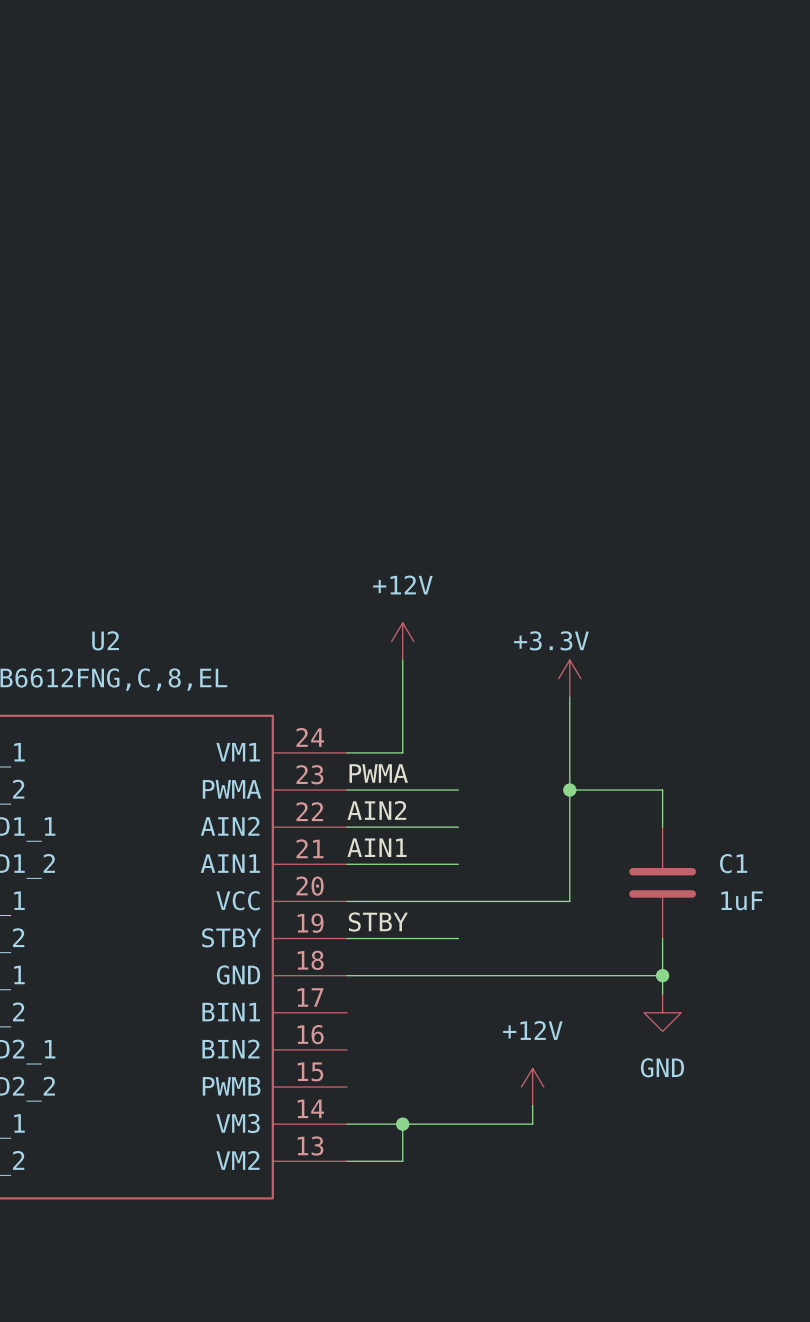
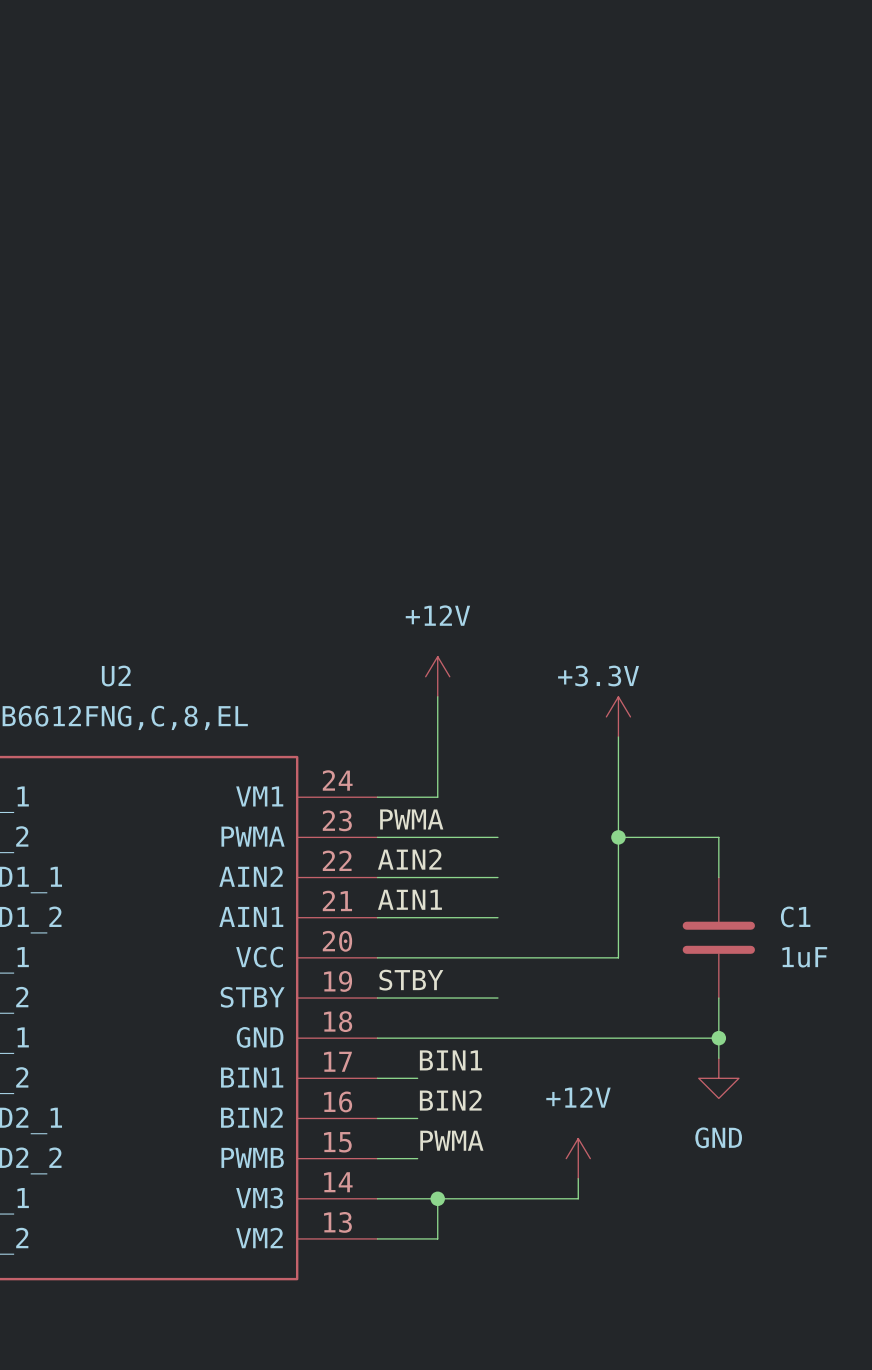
label: none -> BIN1 (450, 1060)
wire: none -> (377, 1078) (417, 1078)
label: none -> BIN2 (450, 1100)
wire: none -> (377, 1118) (417, 1118)
label: none -> PWMA (451, 1140)
wire: none -> (377, 1158) (417, 1158)

